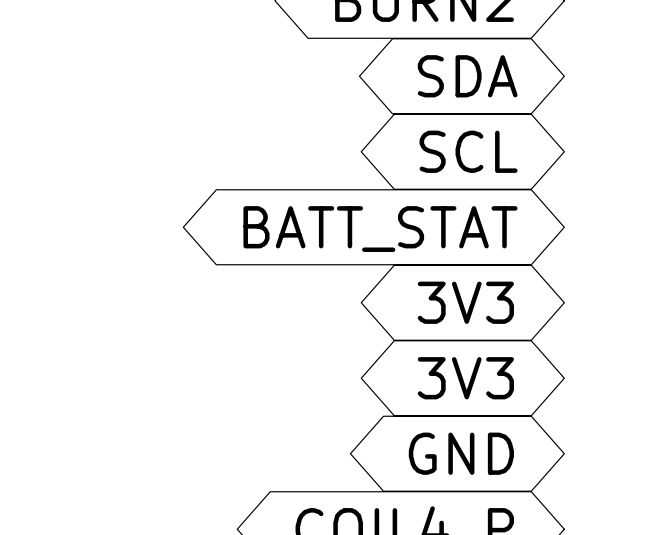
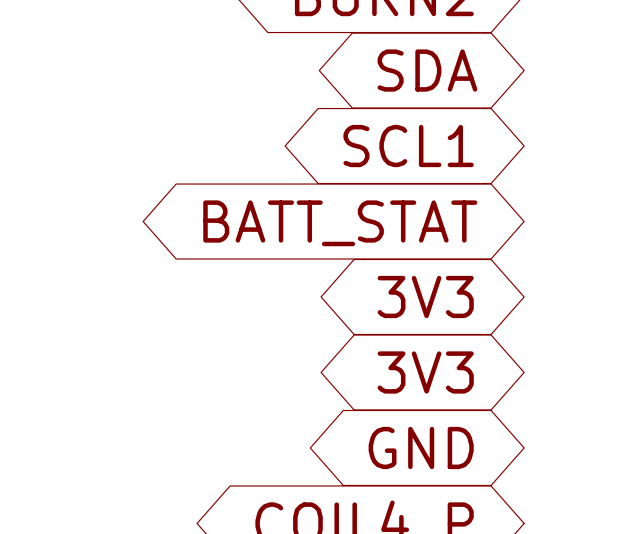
global label: SCL (468, 151) -> SCL1 (408, 146)

